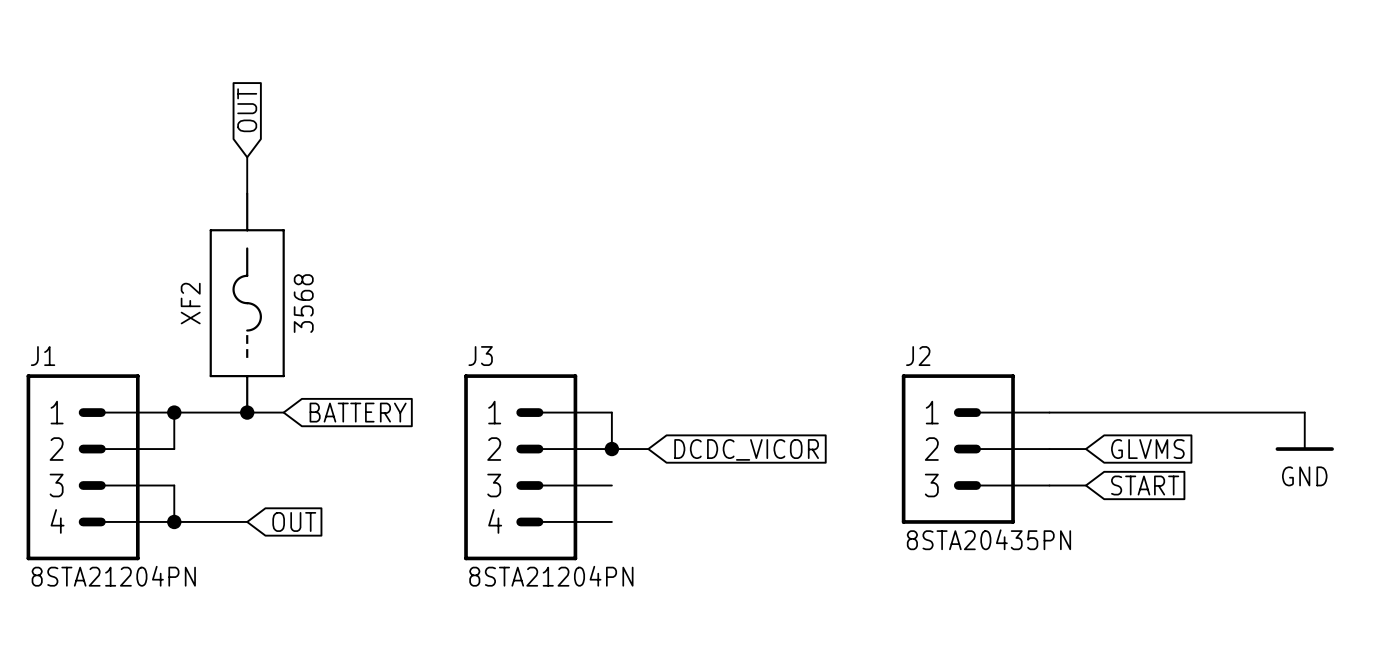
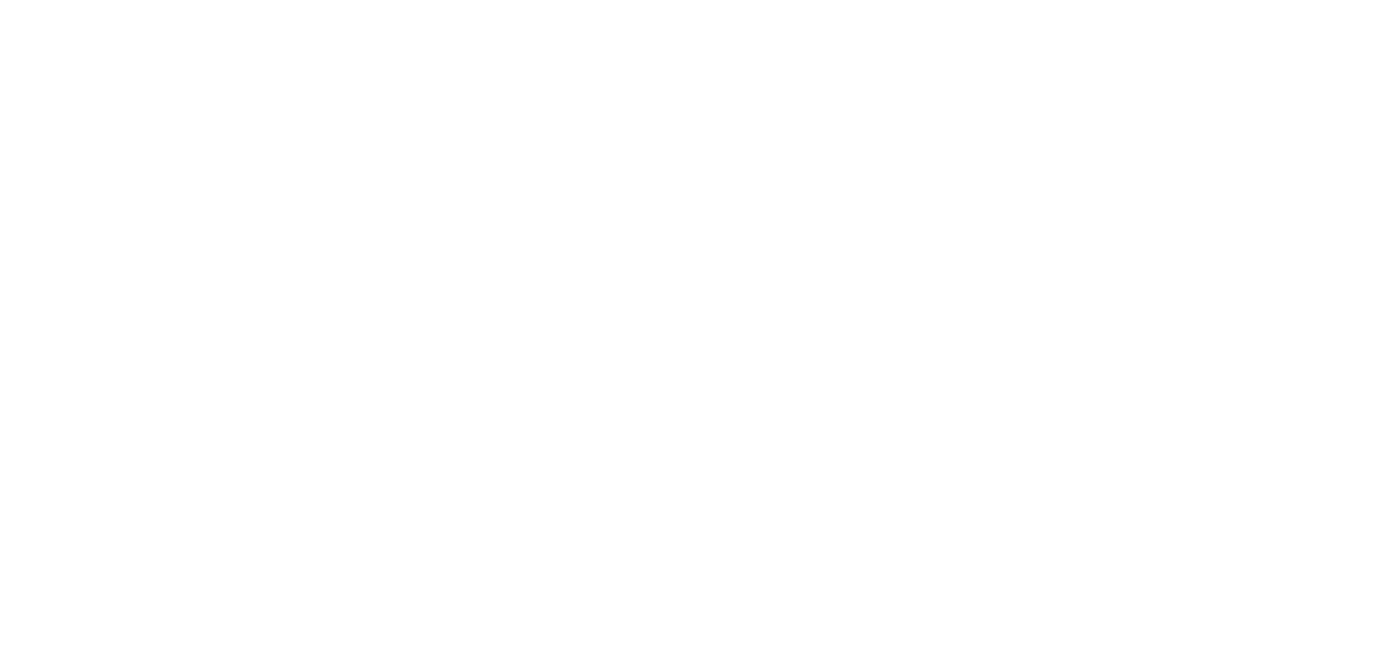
global label: OUT (247, 110) -> none
wire: (247, 157) (247, 193) -> none
XF2: (247, 303) -> none
junction: (174, 412) -> none
junction: (247, 412) -> none
wire: (283, 412) (174, 412) (174, 449) -> none
global label: BATTERY (358, 412) -> none
wire: (611, 412) (611, 449) (648, 449) -> none
wire: (1049, 412) (1304, 412) -> none
power symbol: GND (1304, 431) -> none
junction: (611, 449) -> none
global label: DCDC_VICOR (746, 449) -> none
J2: (975, 449) -> none
wire: (1049, 449) (1085, 449) -> none
global label: GLVMS (1147, 449) -> none
J1: (100, 467) -> none
J3: (538, 467) -> none
wire: (174, 485) (174, 521) (247, 521) -> none
wire: (1049, 485) (1085, 485) -> none
global label: START (1145, 485) -> none
junction: (174, 521) -> none
global label: OUT (294, 521) -> none

